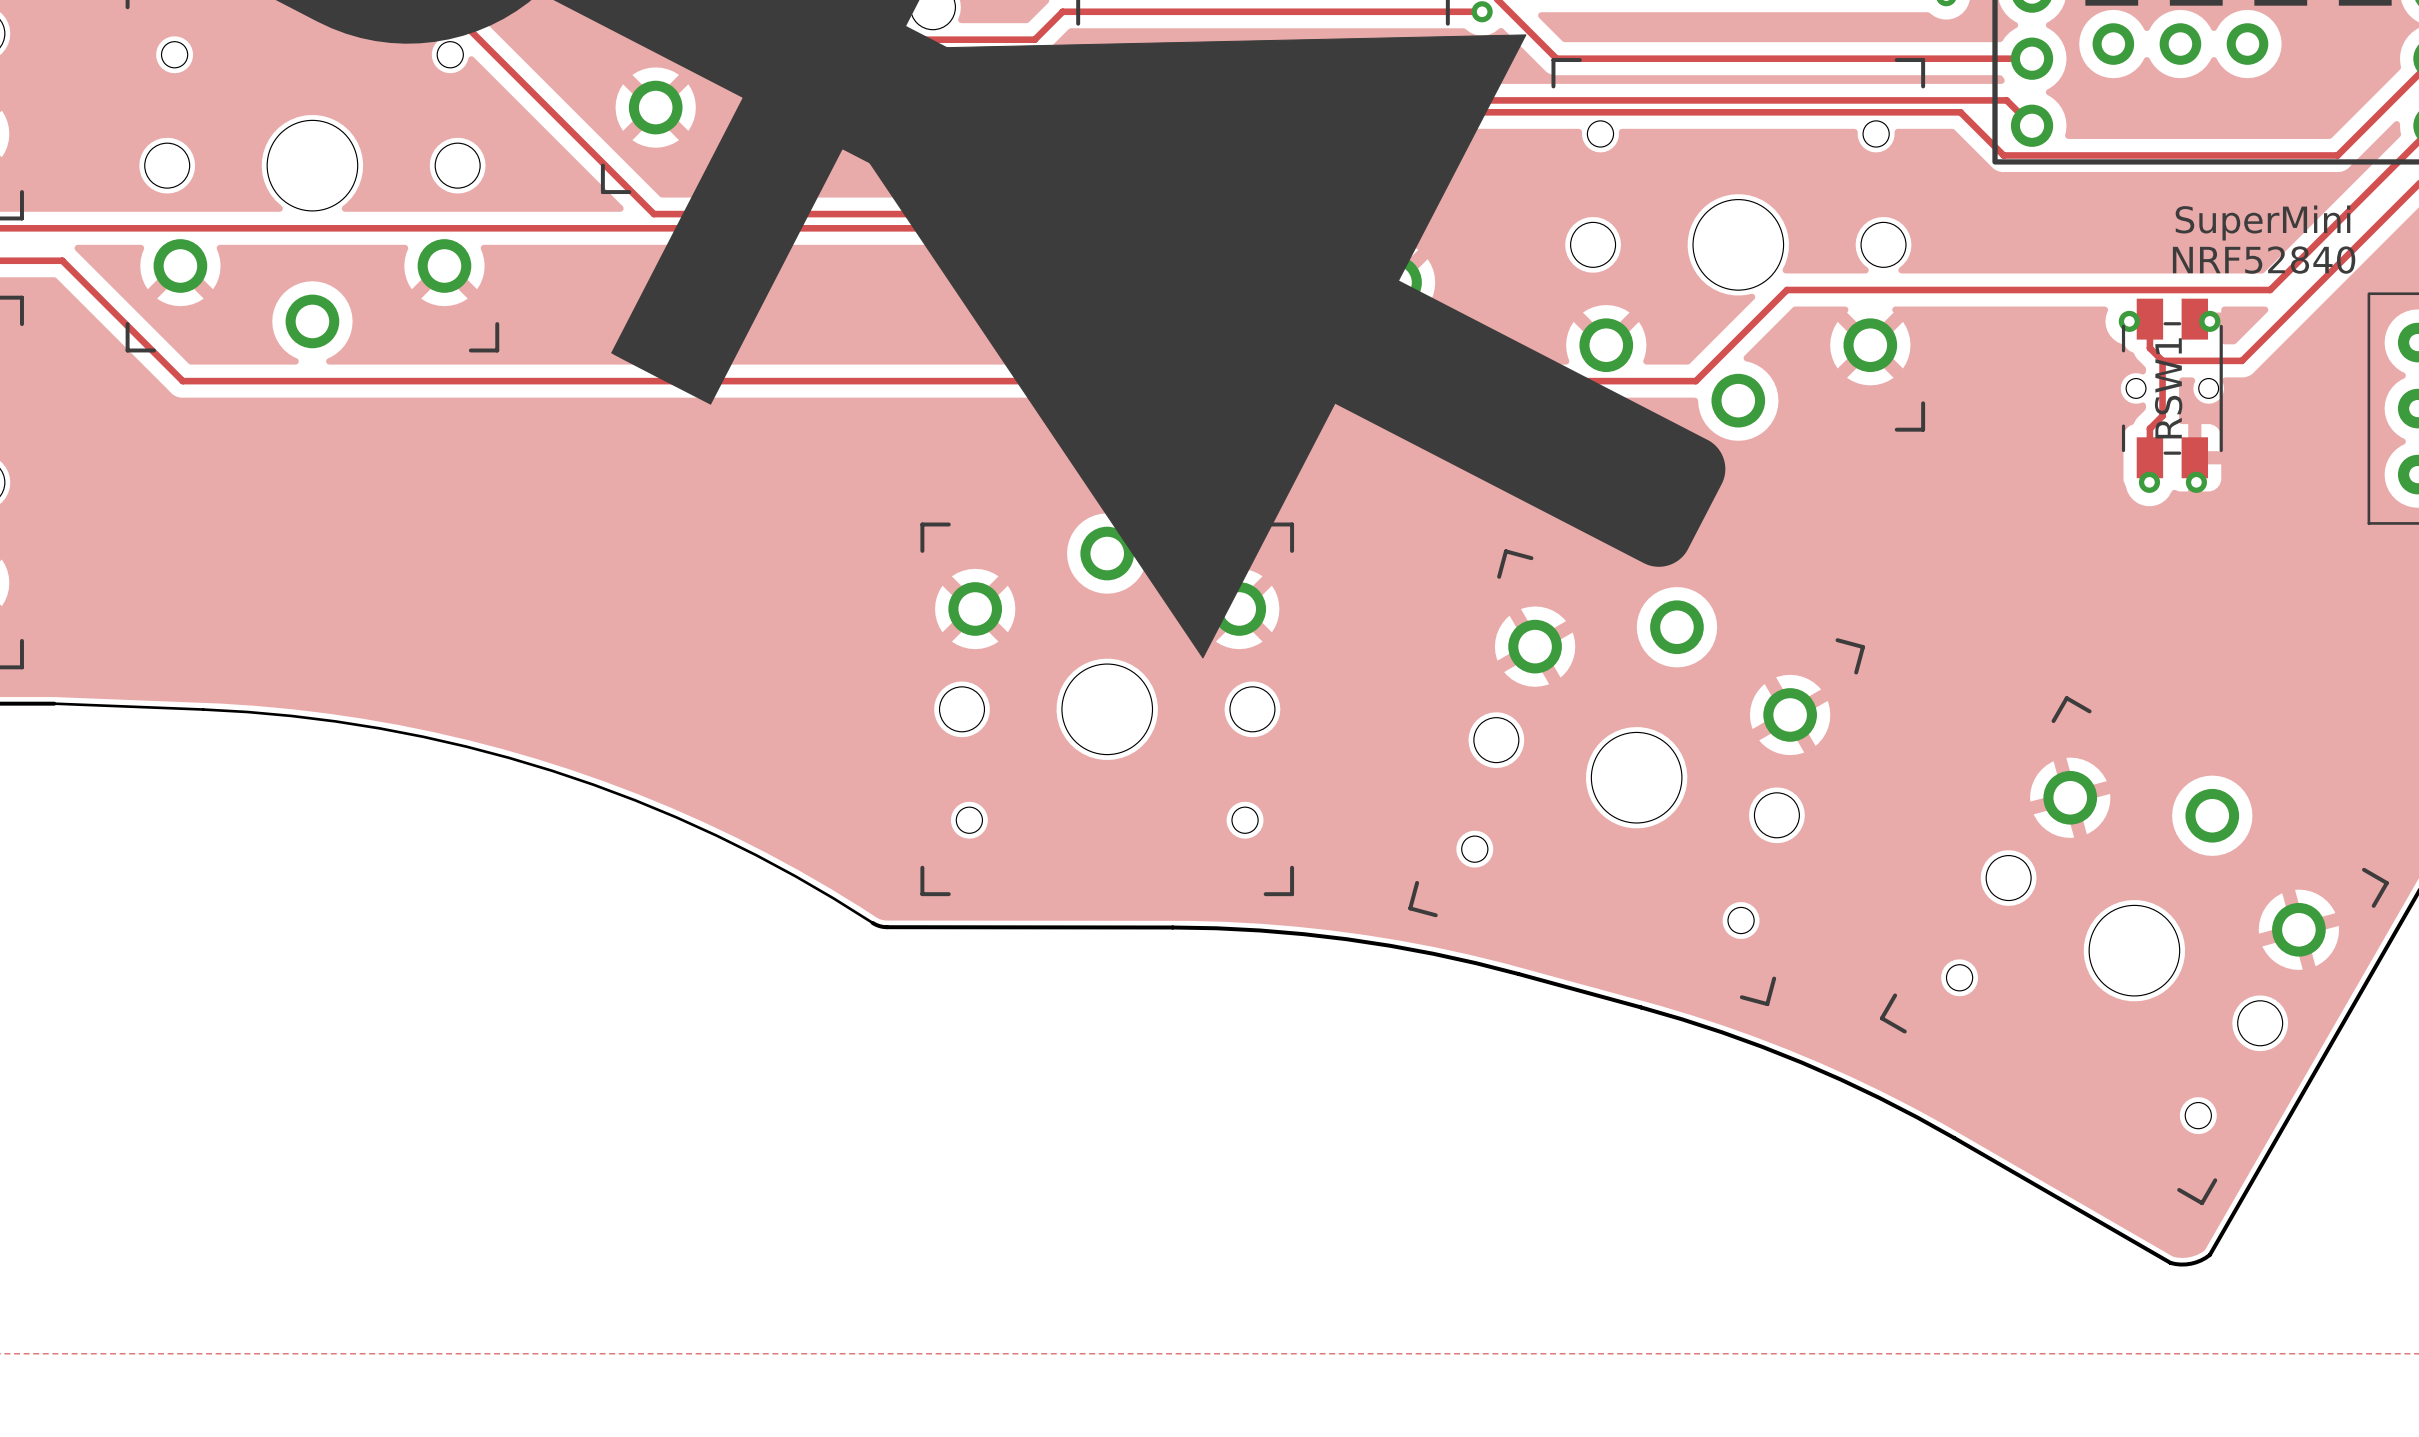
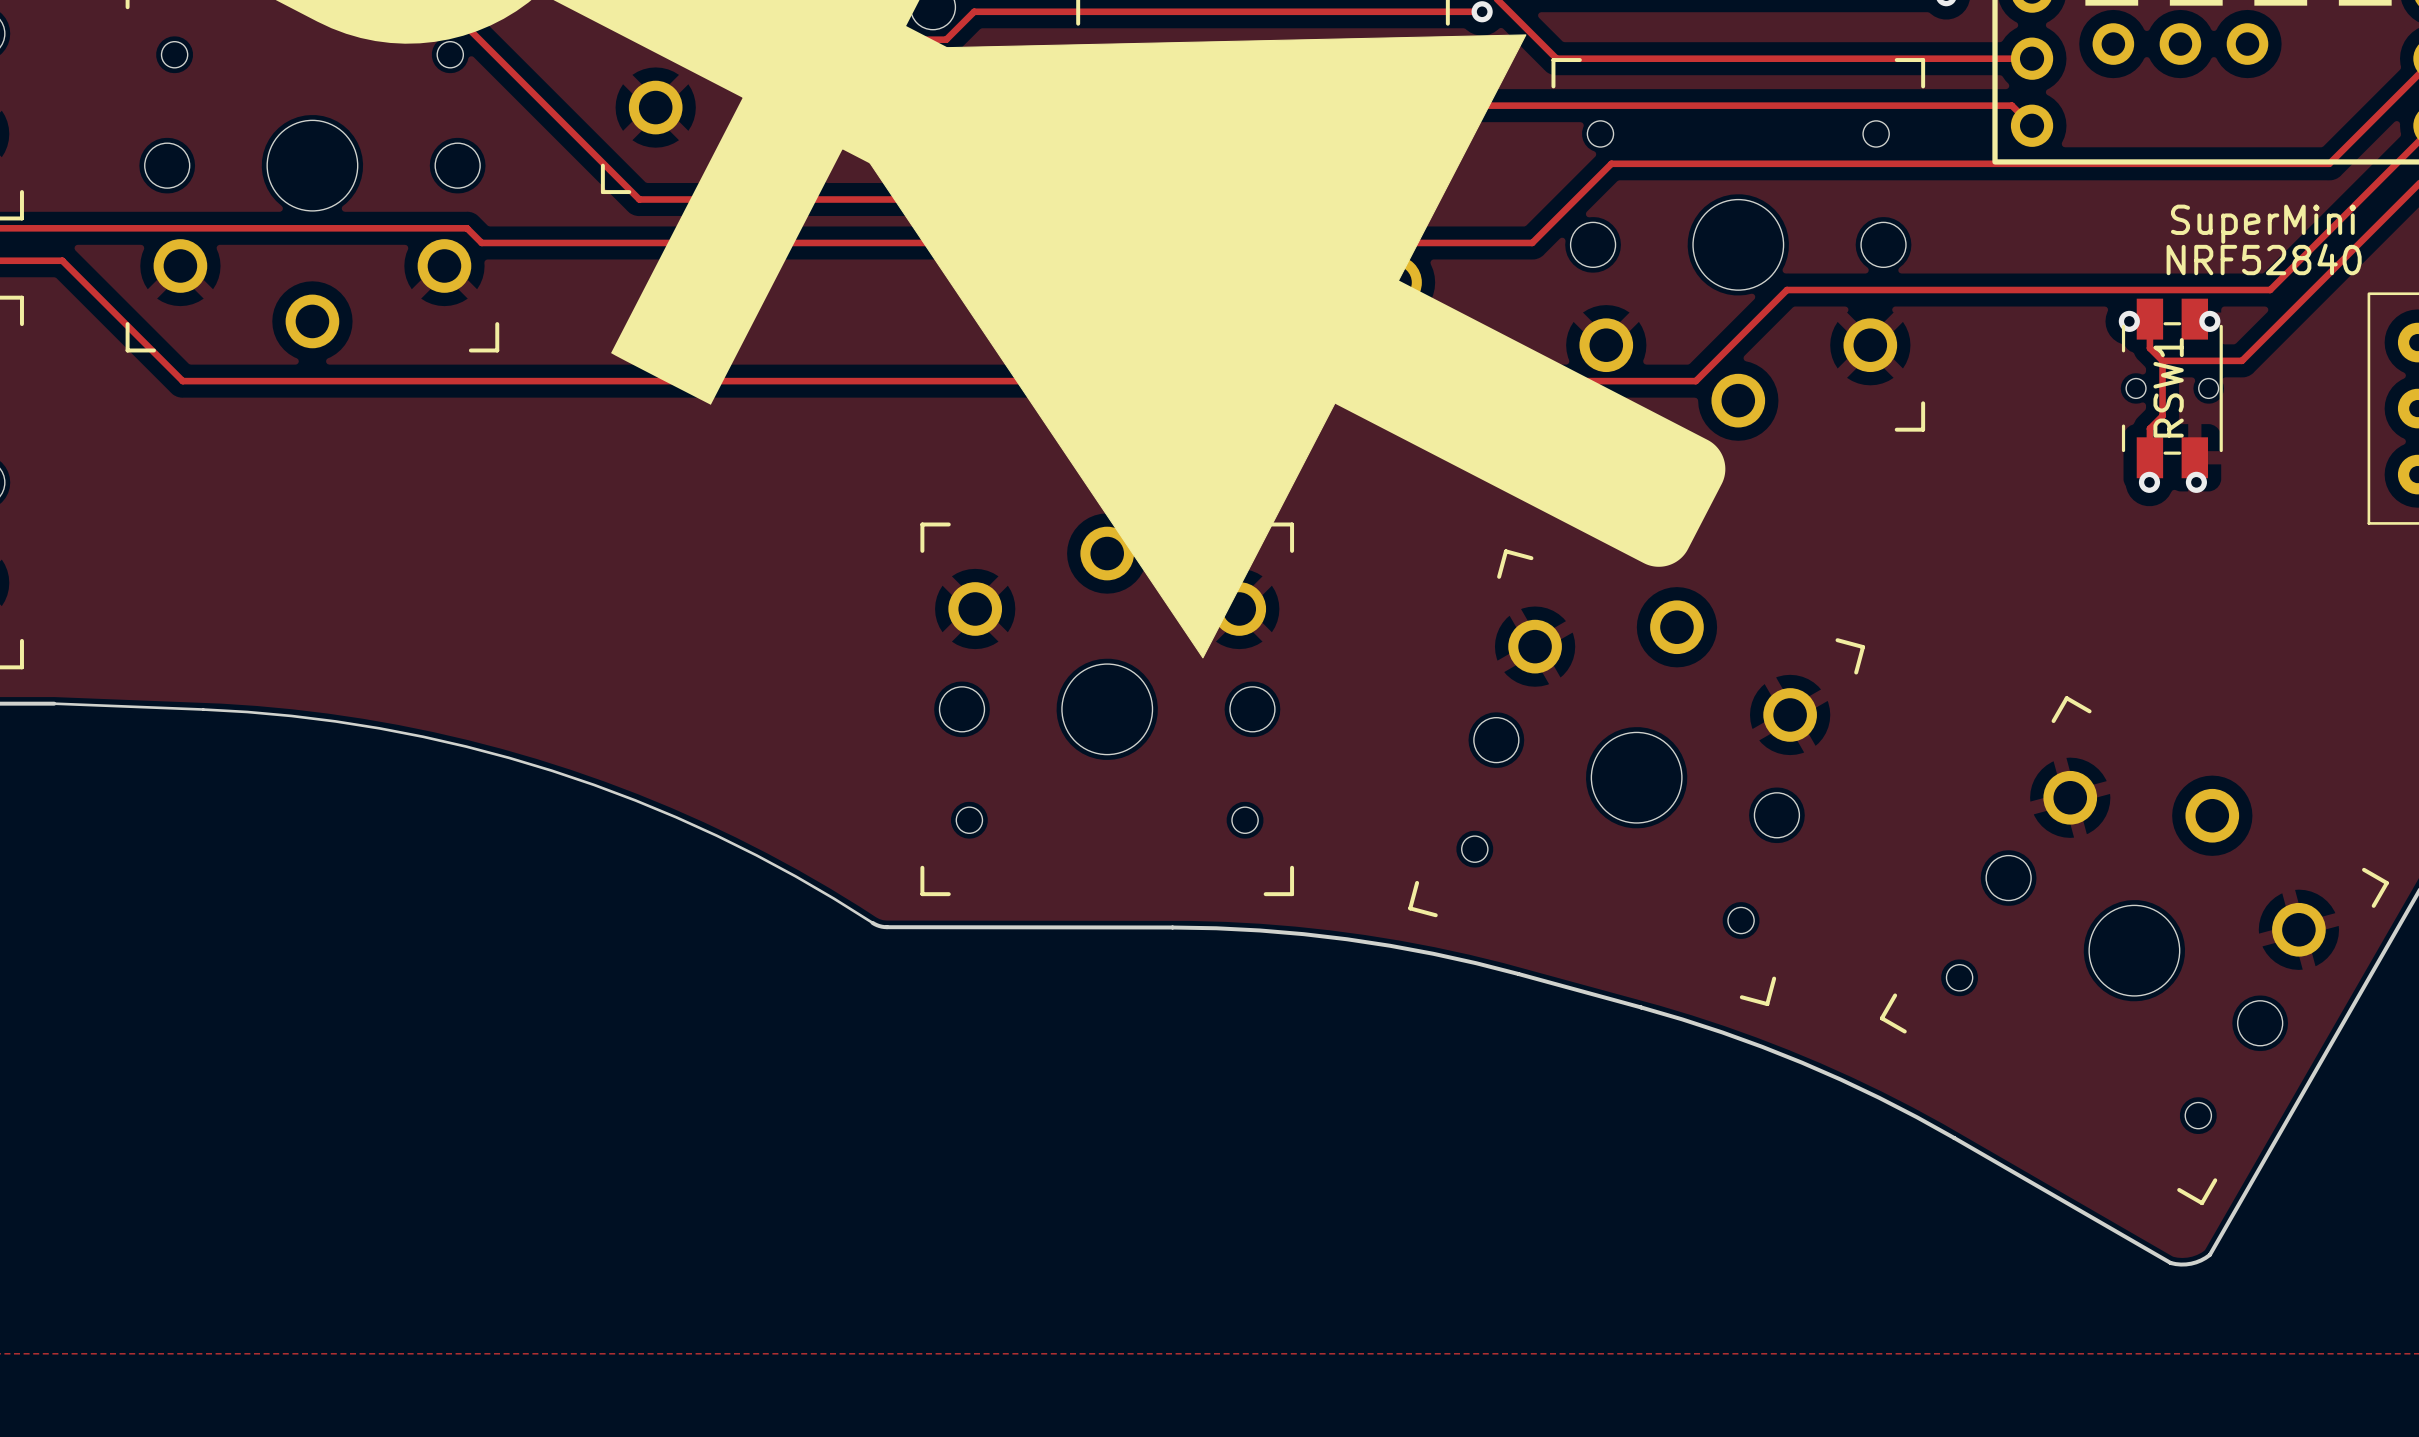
track: (1062, 11) (1034, 39) (946, 39) -> (1062, 11) (974, 11) (946, 39)
track: (2011, 105) (2006, 100) (1126, 100) (1012, 214) (653, 214) (639, 199) -> (2011, 105) (1140, 105) (1047, 199) (639, 199)
track: (2337, 155) (2003, 155) (1960, 112) (1131, 112) (1015, 228) (467, 228) -> (2337, 155) (2329, 163) (1611, 163) (1532, 242) (481, 242) (467, 228)

